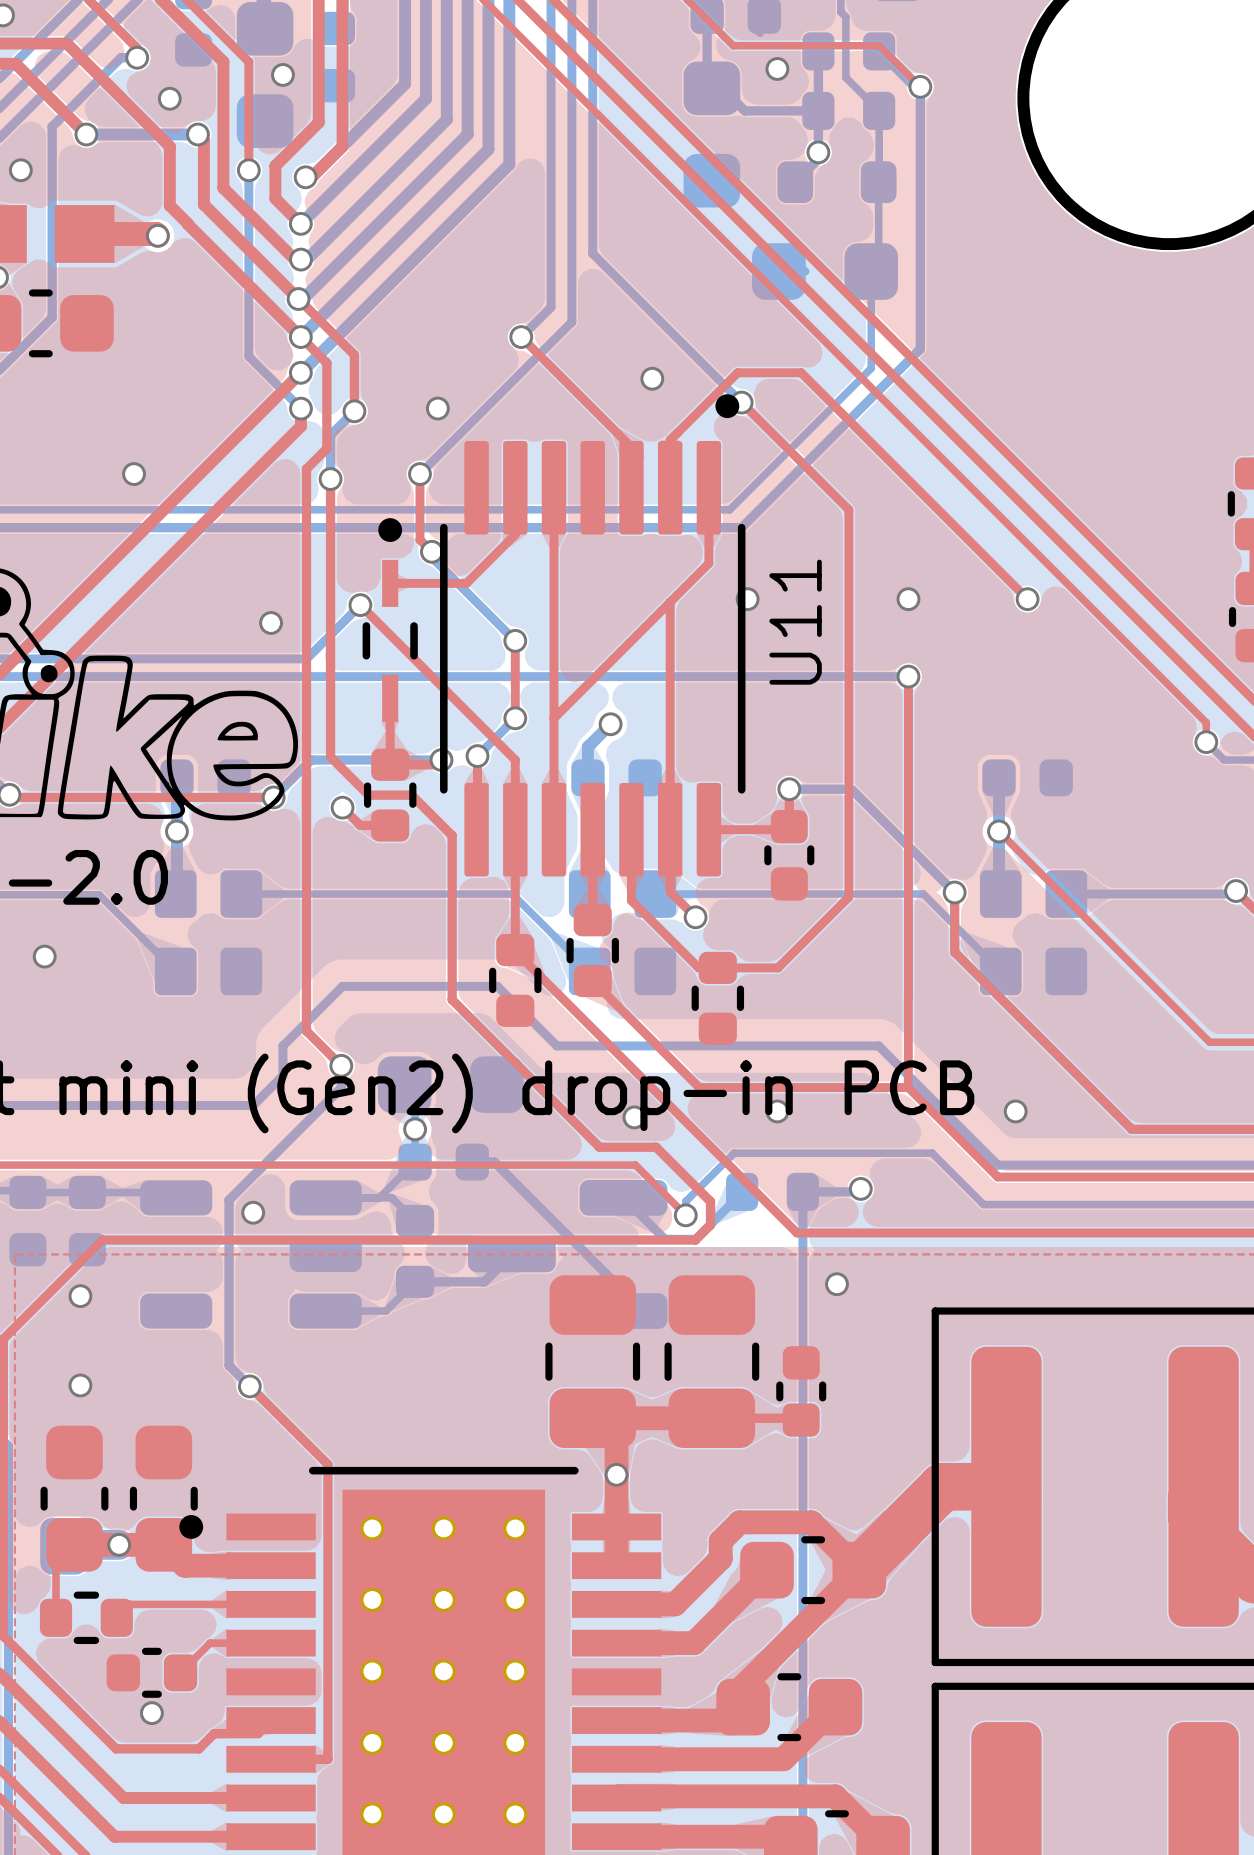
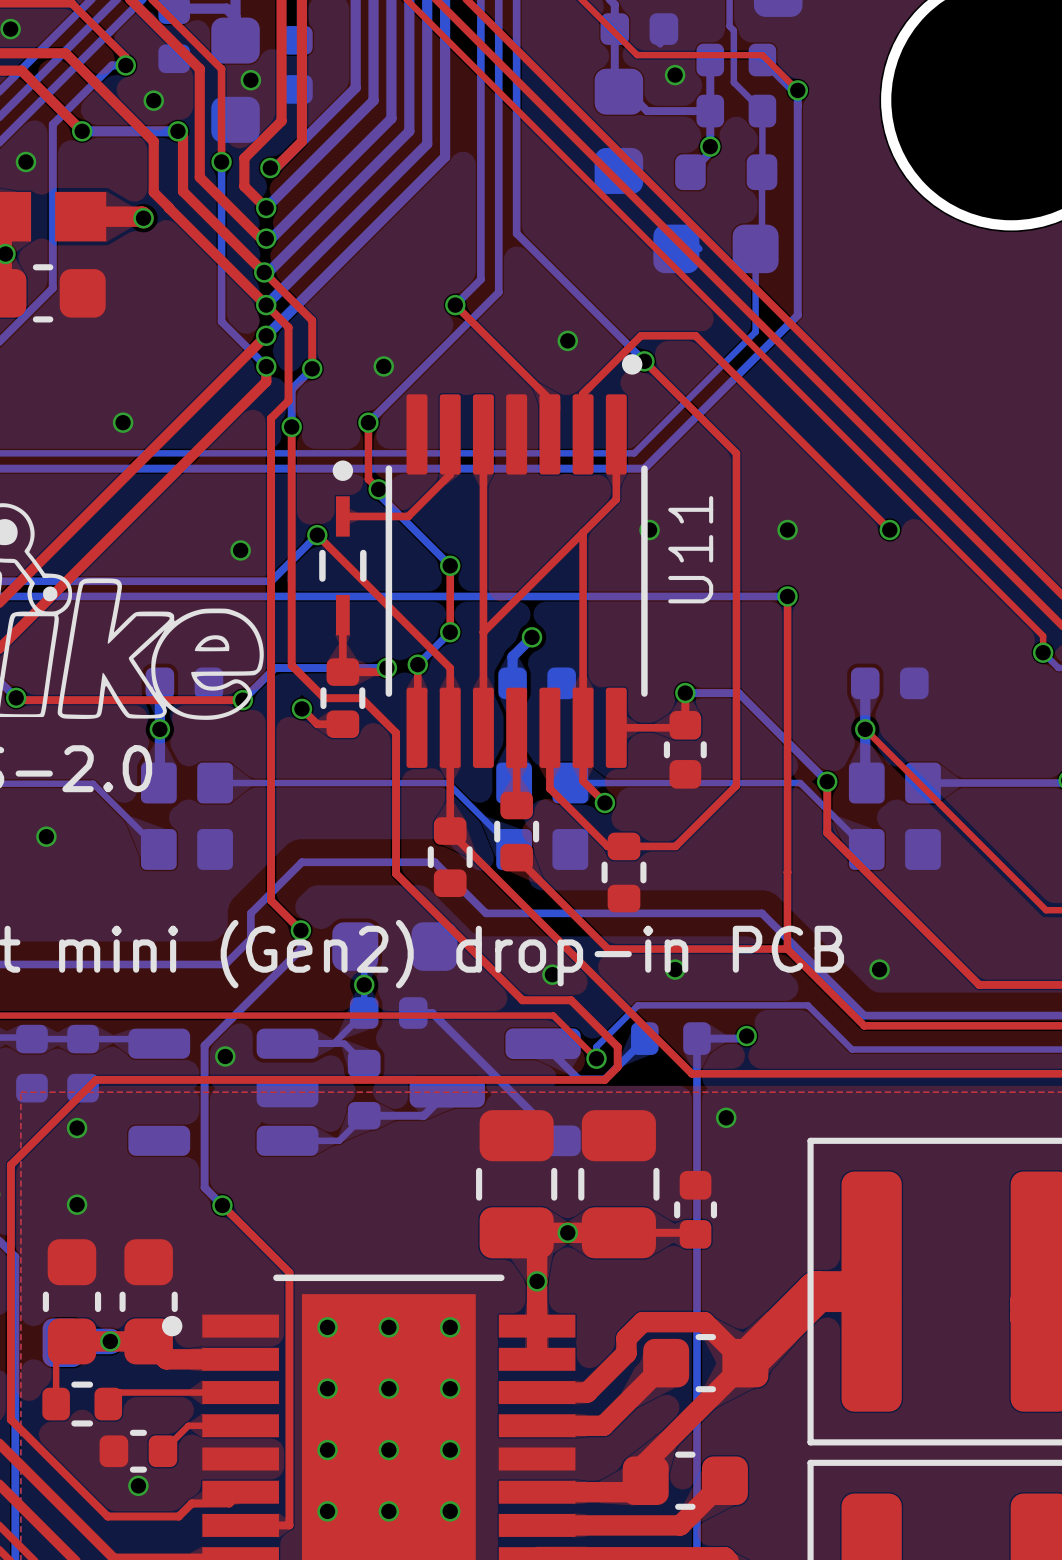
via: none -> (567, 1232)

